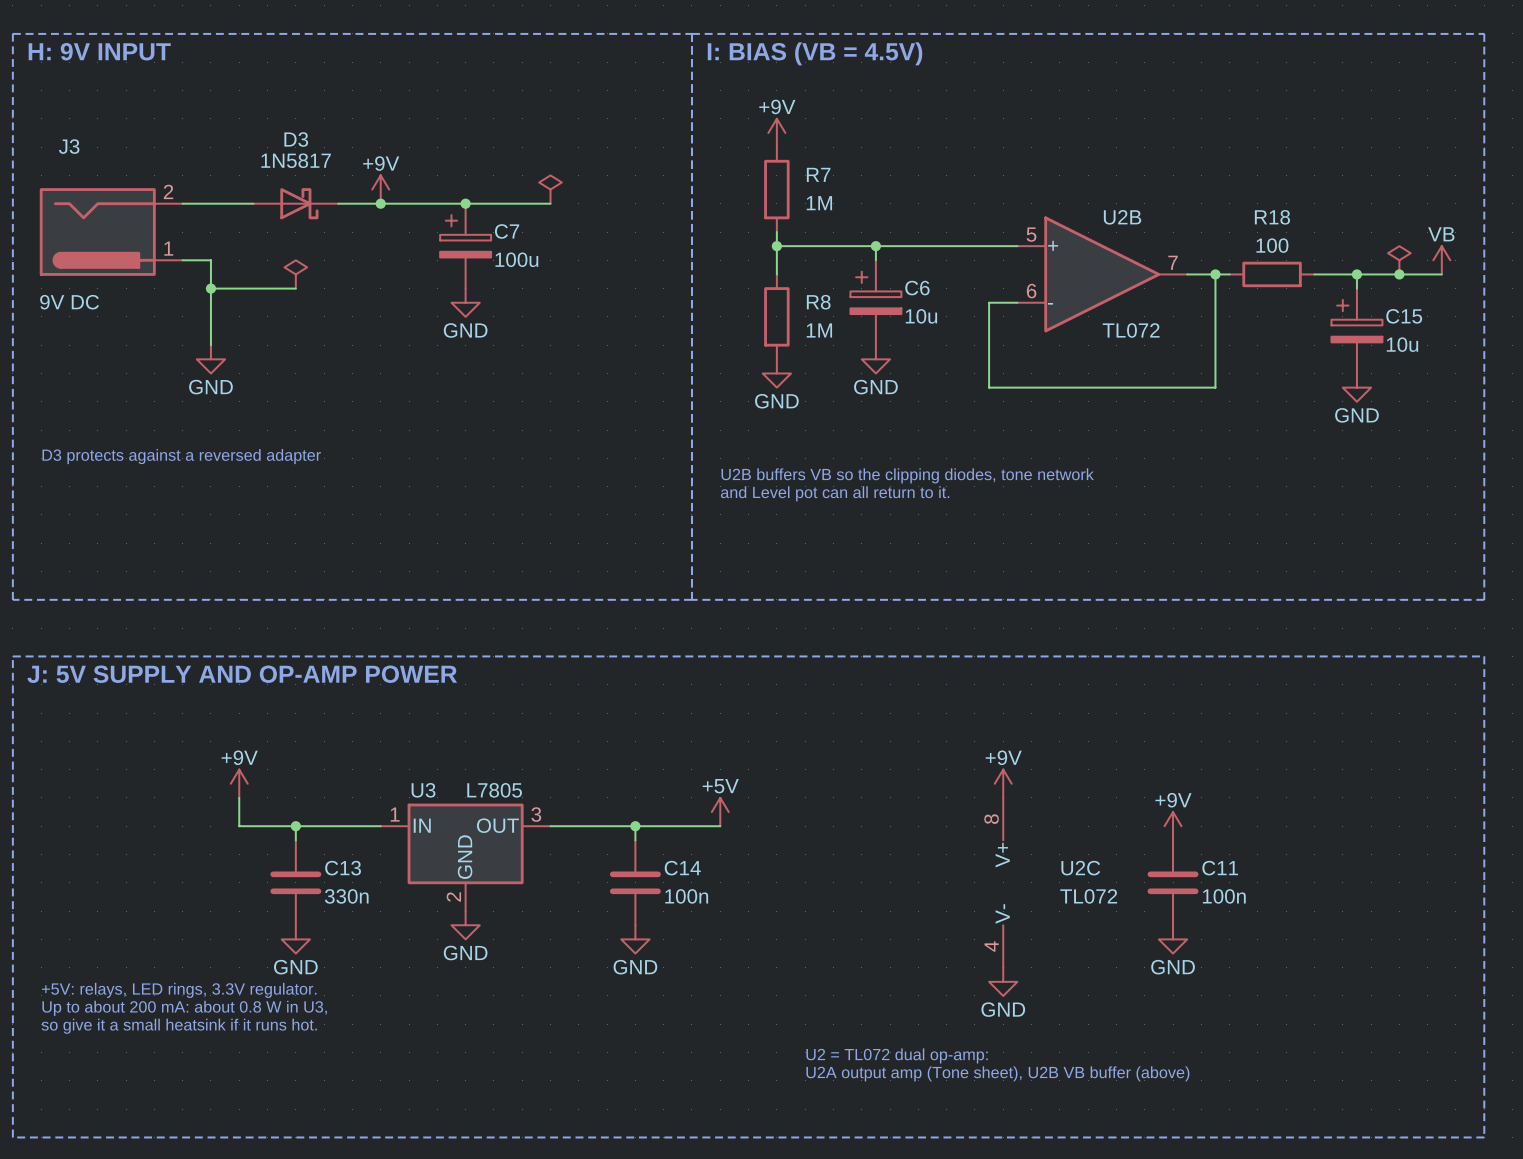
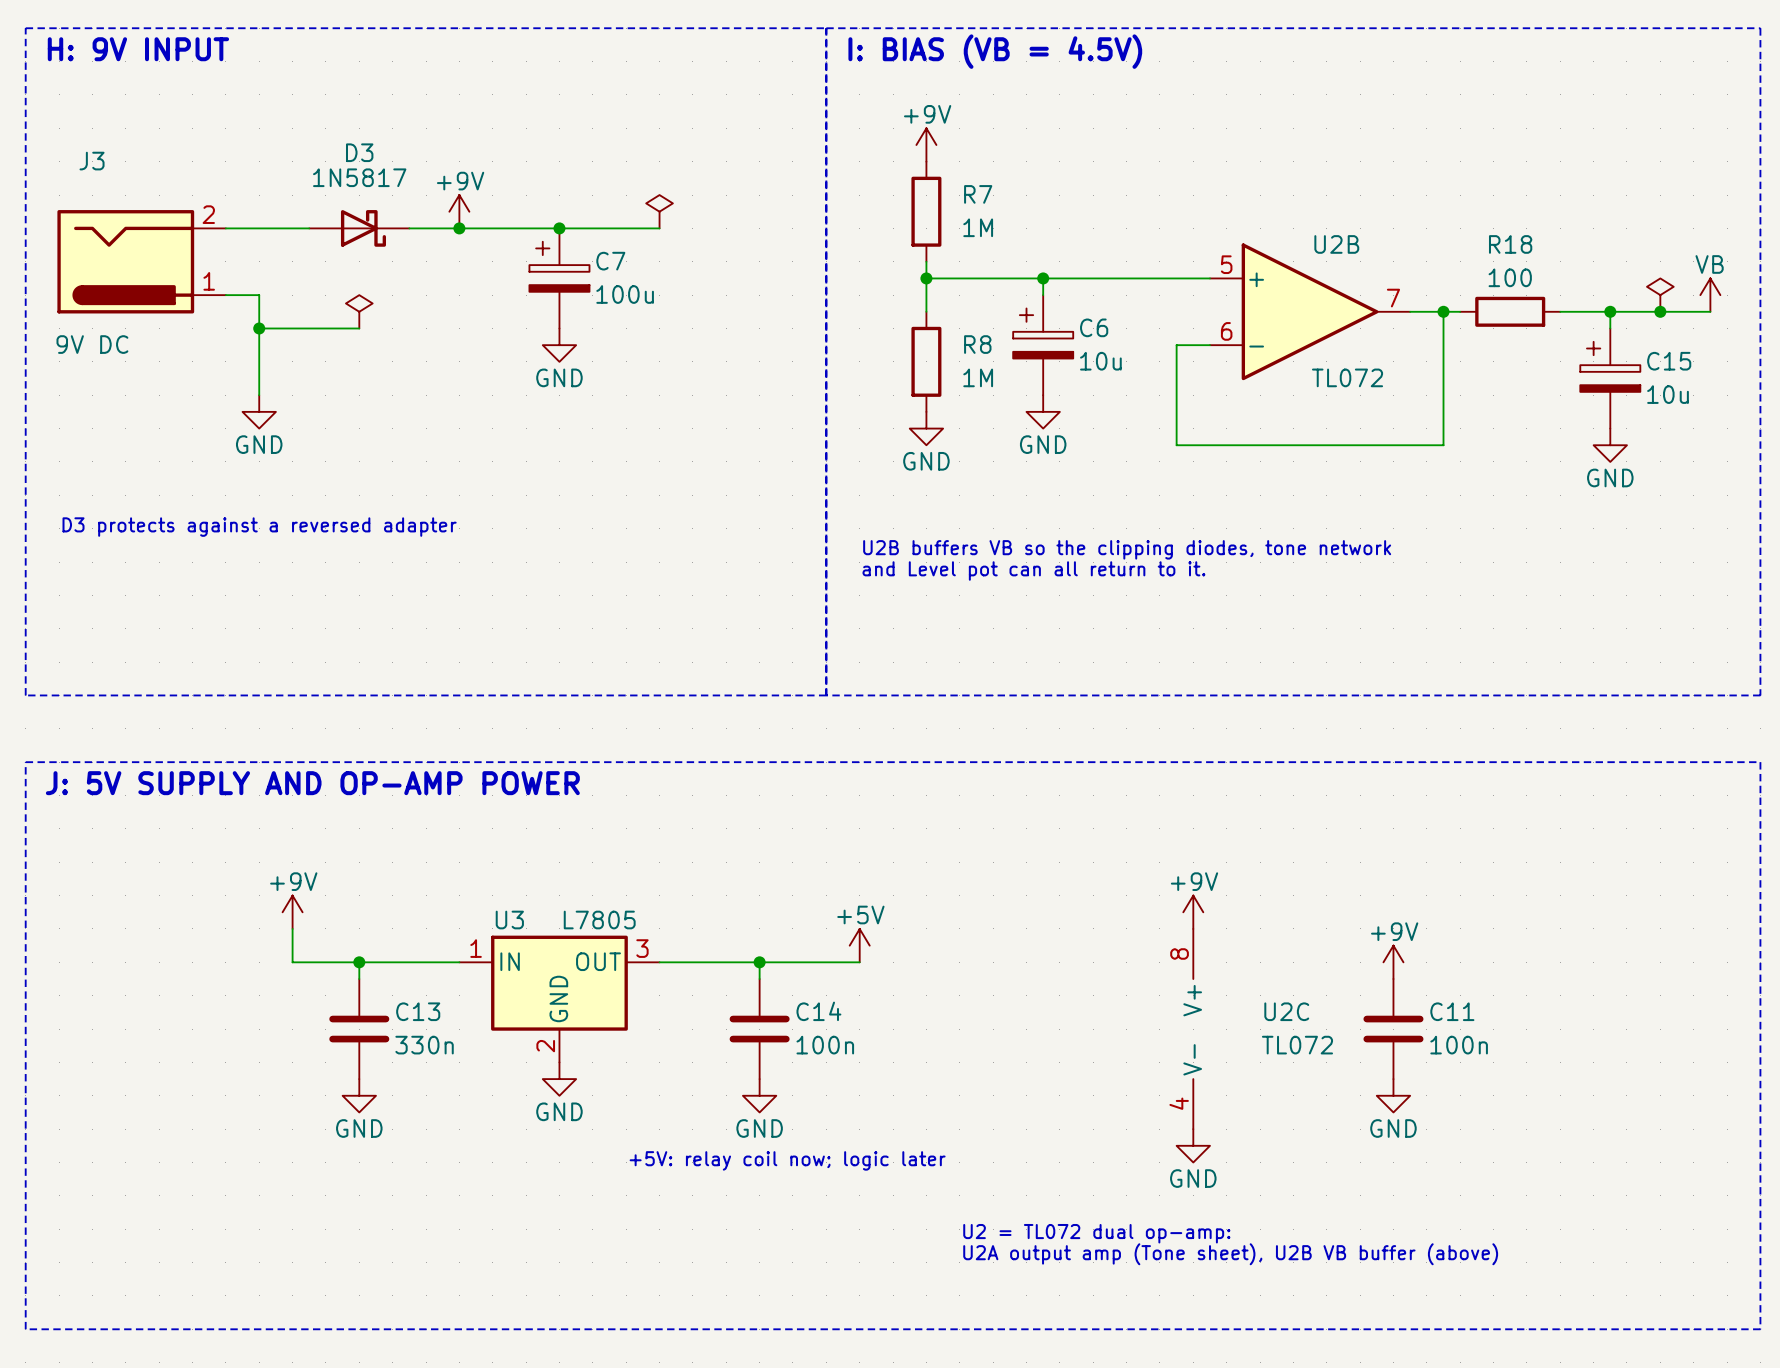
text: +5V: relays, LED rings, 3.3V regulator. (179, 990) -> none
text: none -> +5V: relay coil now; logic later (787, 1160)
text: Up to about 200 mA: about 0.8 W in U3, (184, 1008) -> none
text: so give it a small heatsink if it runs hot. (179, 1026) -> none

